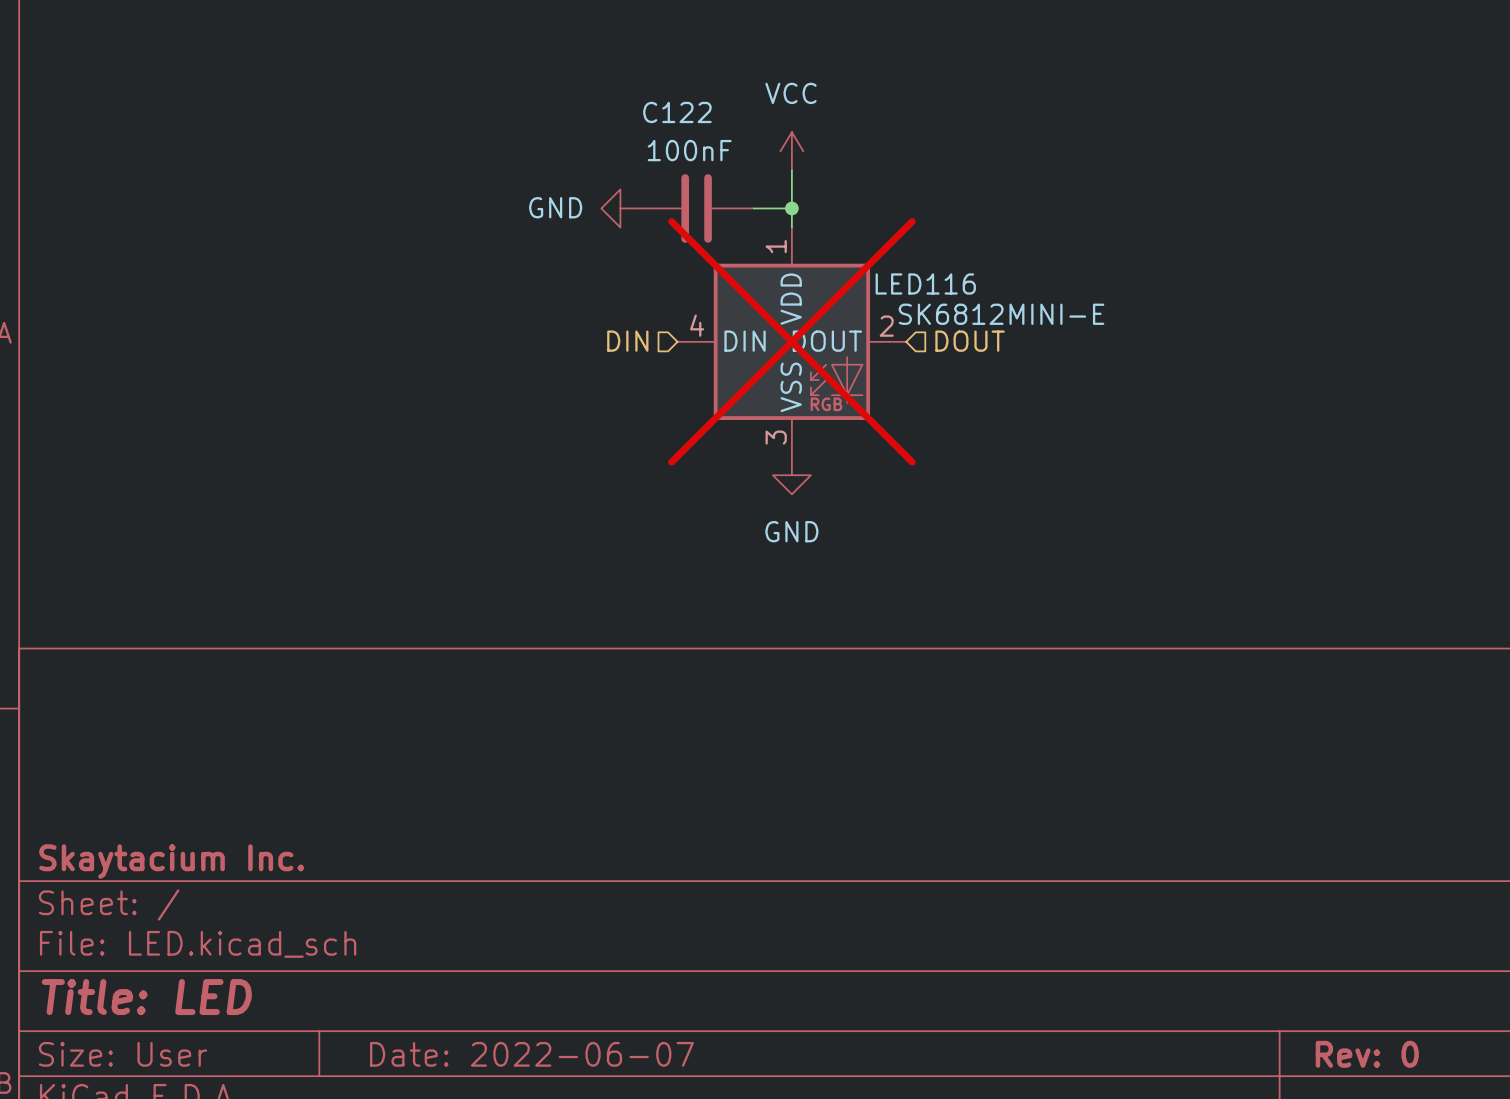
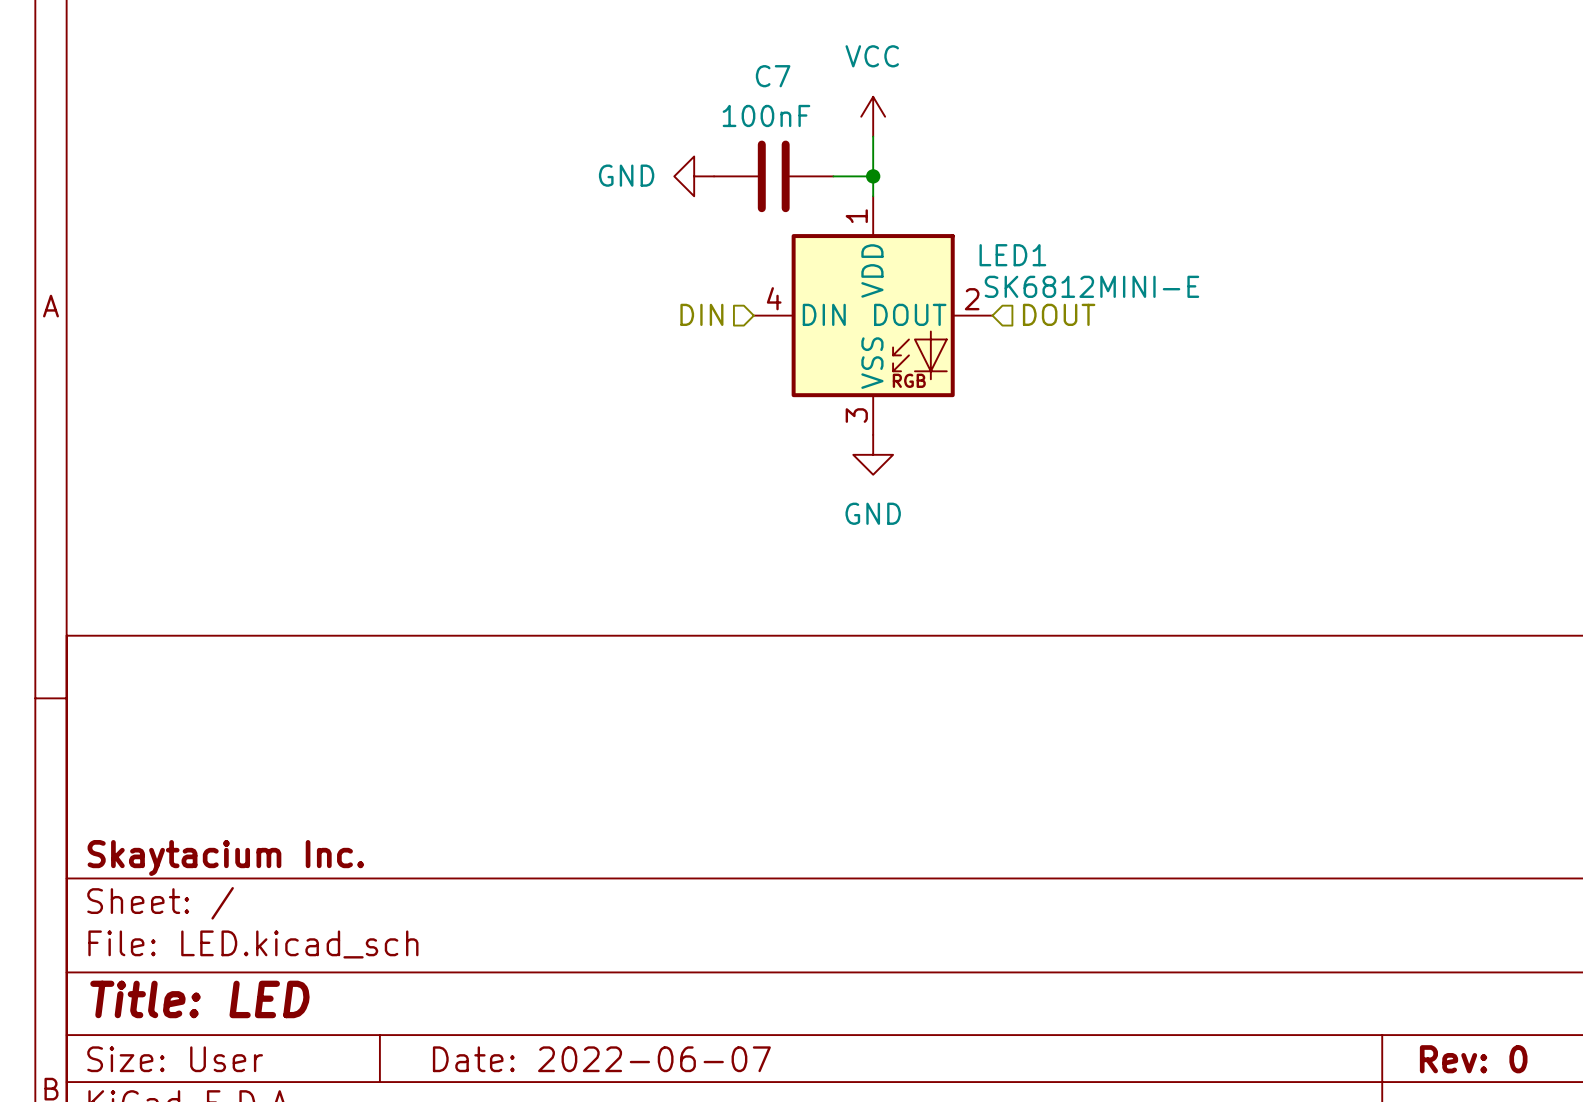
C122 name: C122 (677, 112) -> C7 (773, 76)
LED116 name: LED116 (925, 283) -> LED1 (1012, 255)
LED116 do-not-place cross: (791, 341) -> none

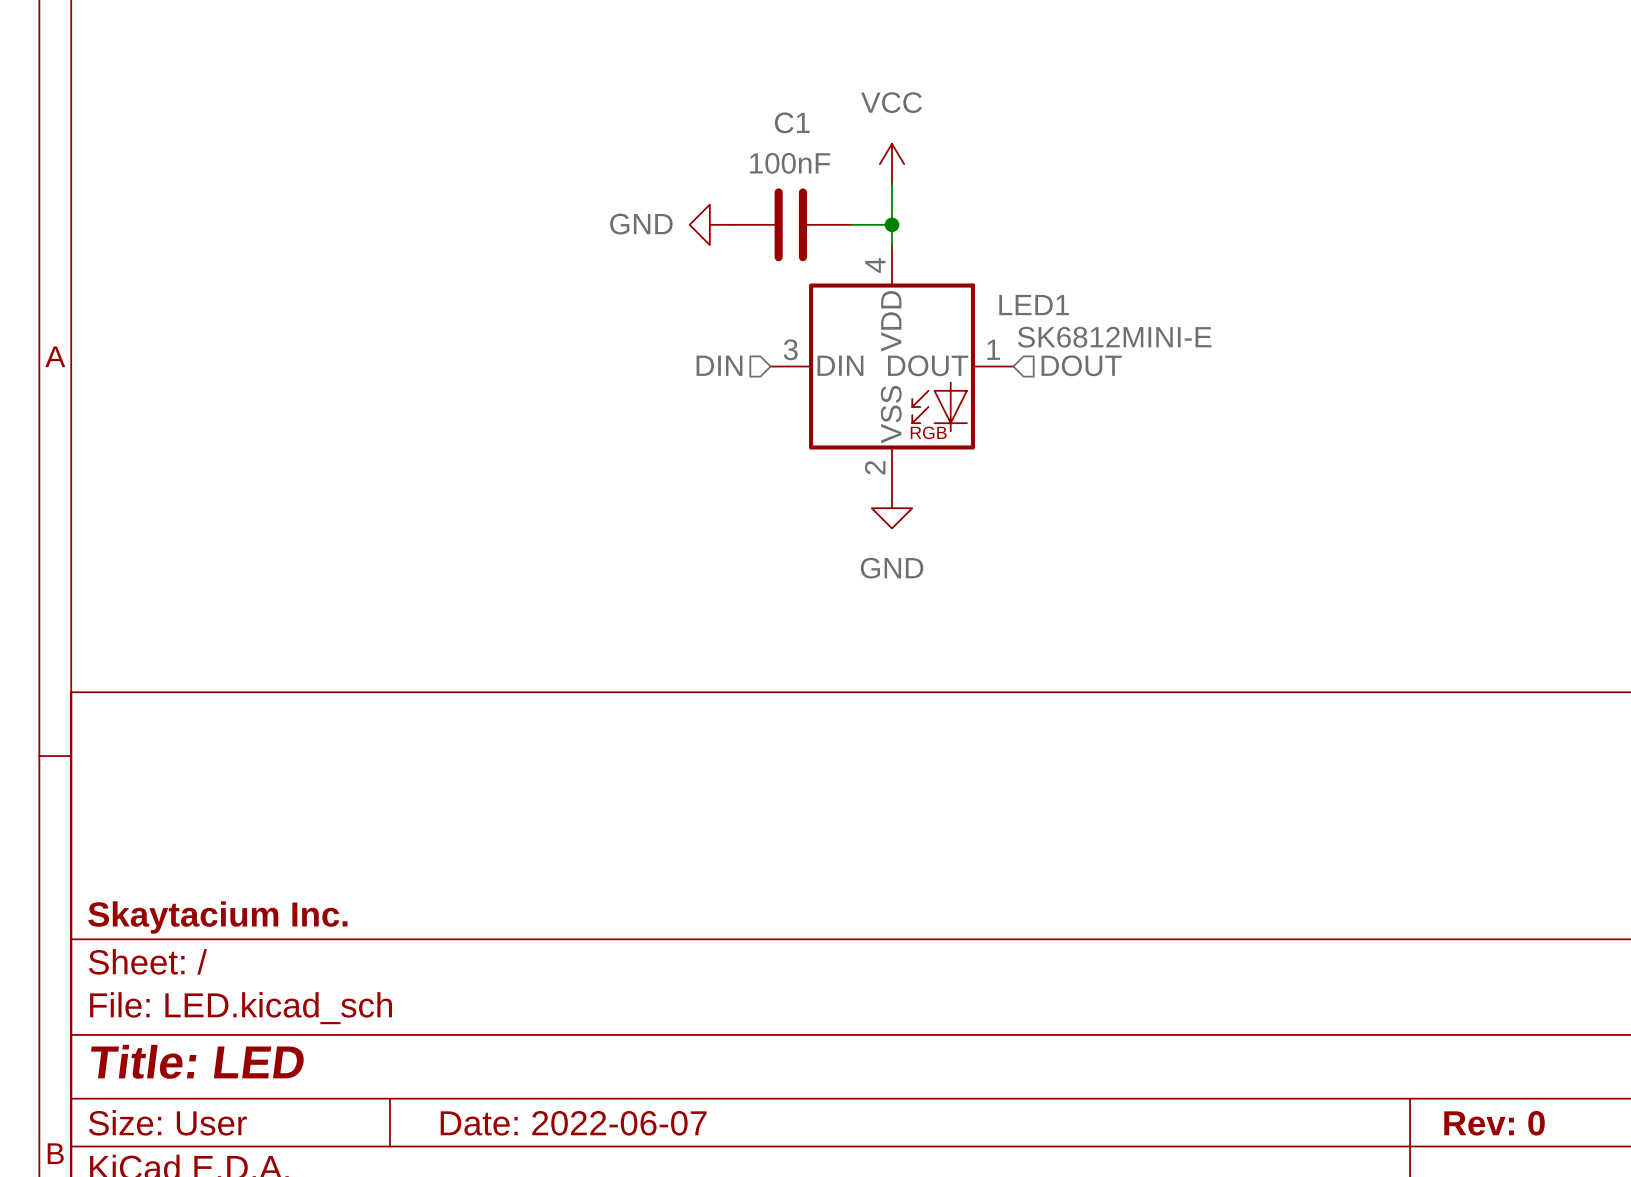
C7 name: C7 (773, 76) -> C1 (792, 122)
LED1 pin number: 1 (856, 216) -> 4 (875, 265)
LED1 pin number: 4 (774, 298) -> 3 (790, 349)
LED1 pin number: 2 (972, 299) -> 1 (993, 349)
LED1 pin number: 3 (856, 415) -> 2 (875, 467)

